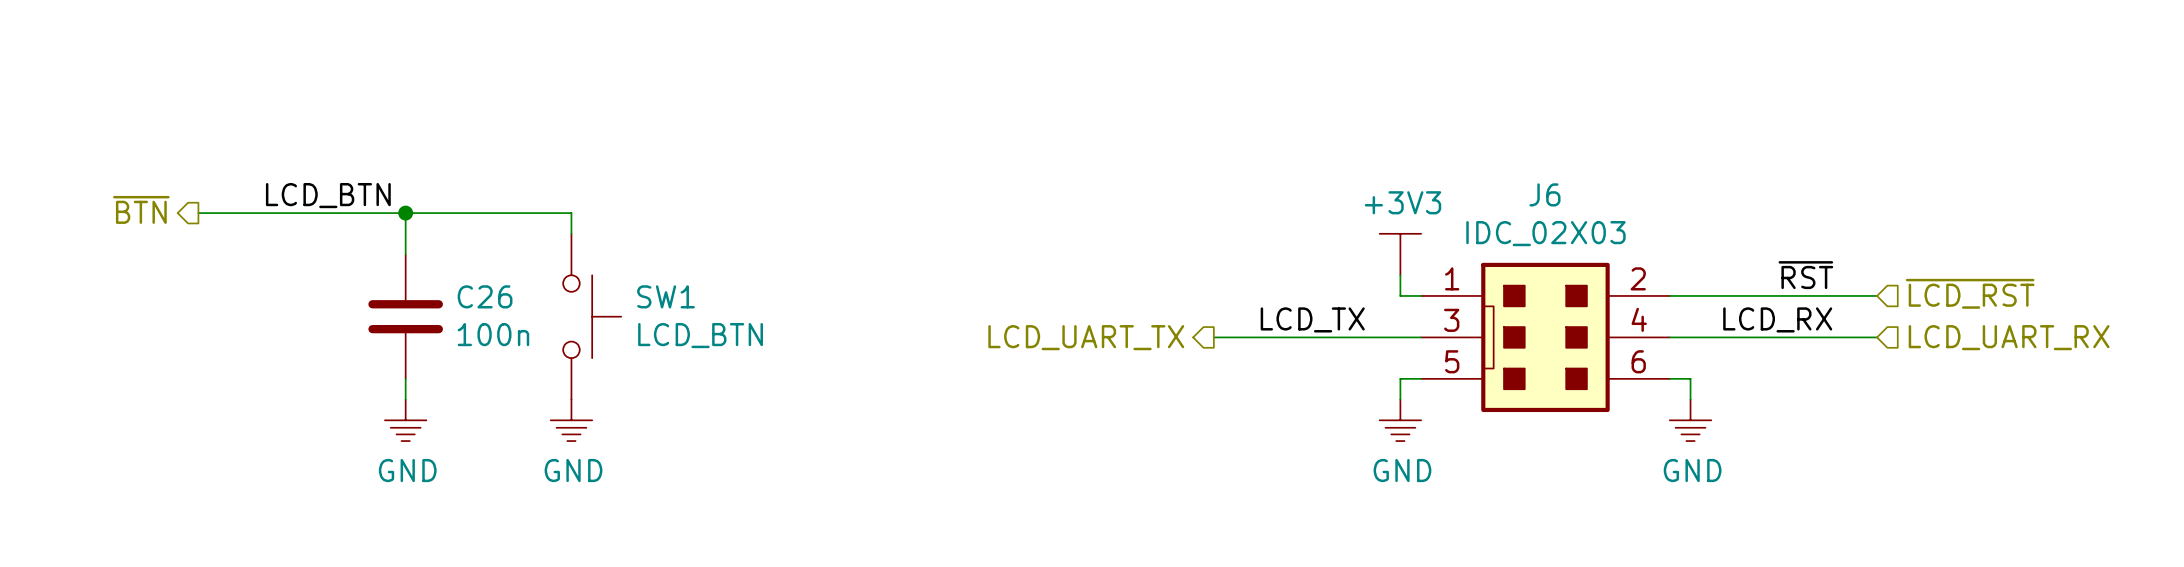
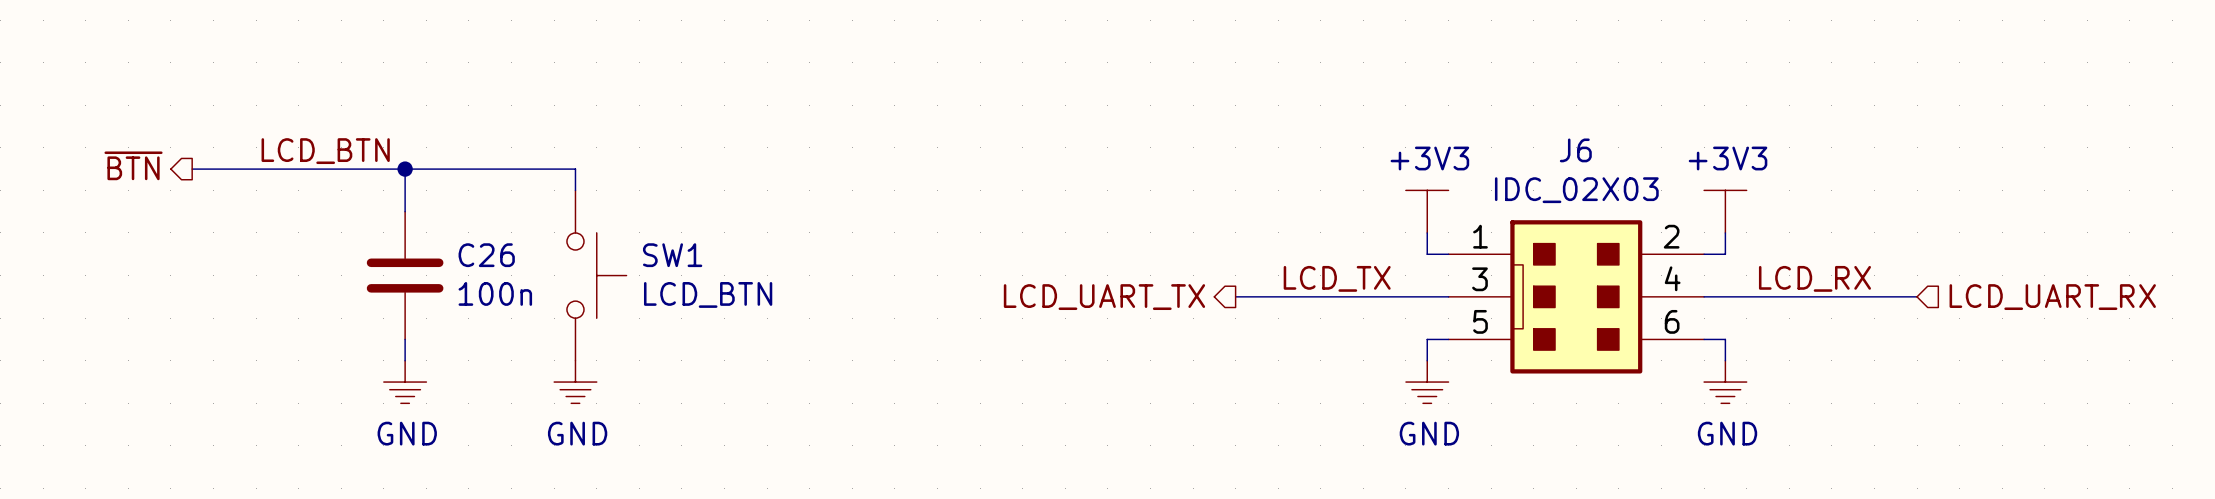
power symbol: none -> +3V3 (1725, 211)
label: ~{RST} (1805, 275) -> none
hierarchical label: ~{LCD_RST} (1970, 293) -> none
wire: (1690, 295) (1877, 295) -> (1725, 254) (1725, 232)

